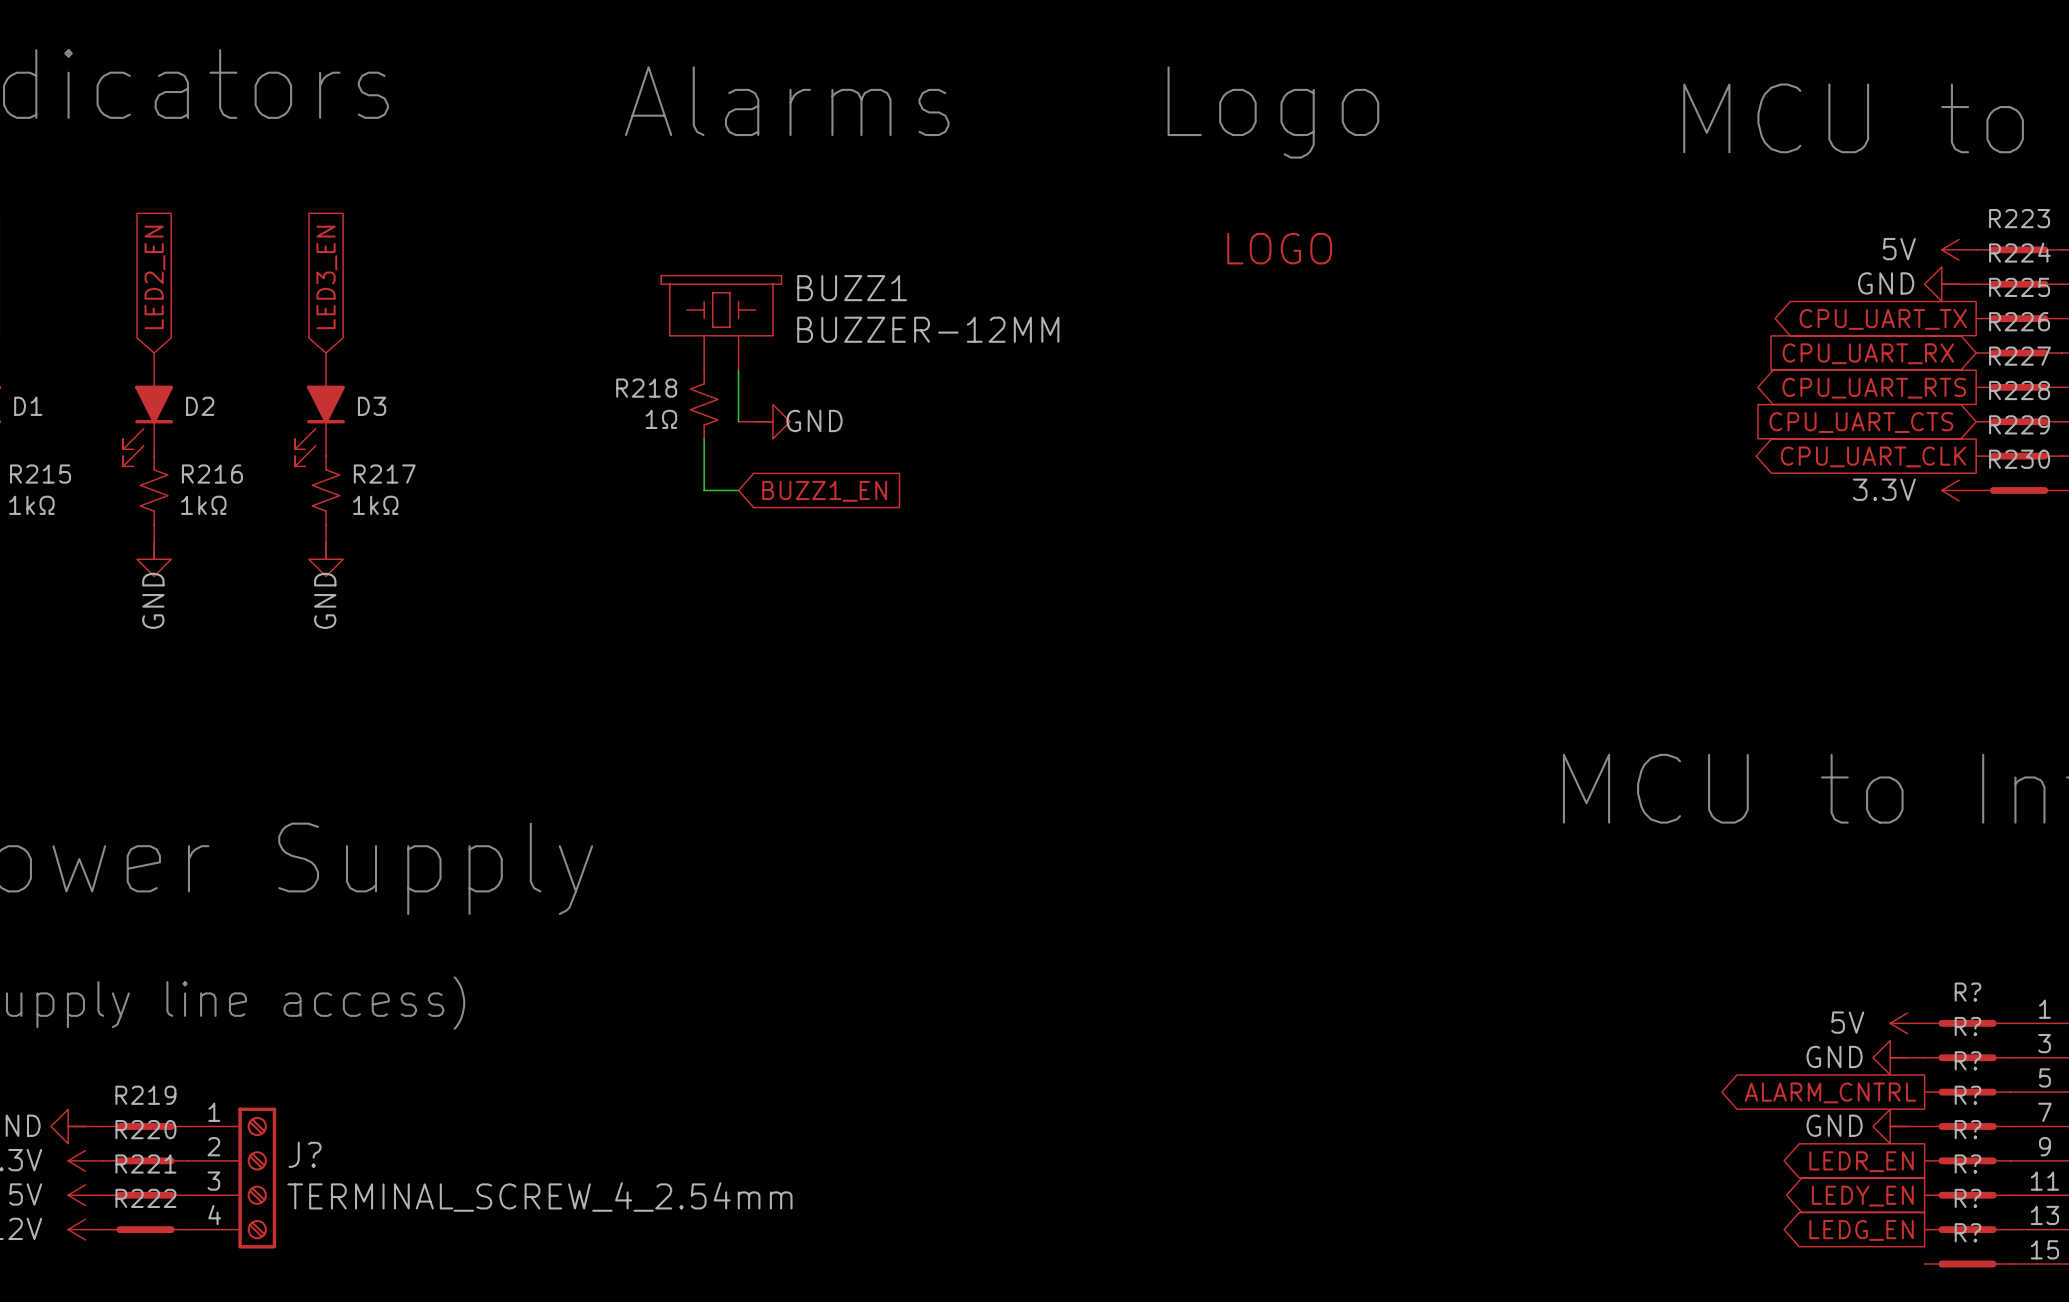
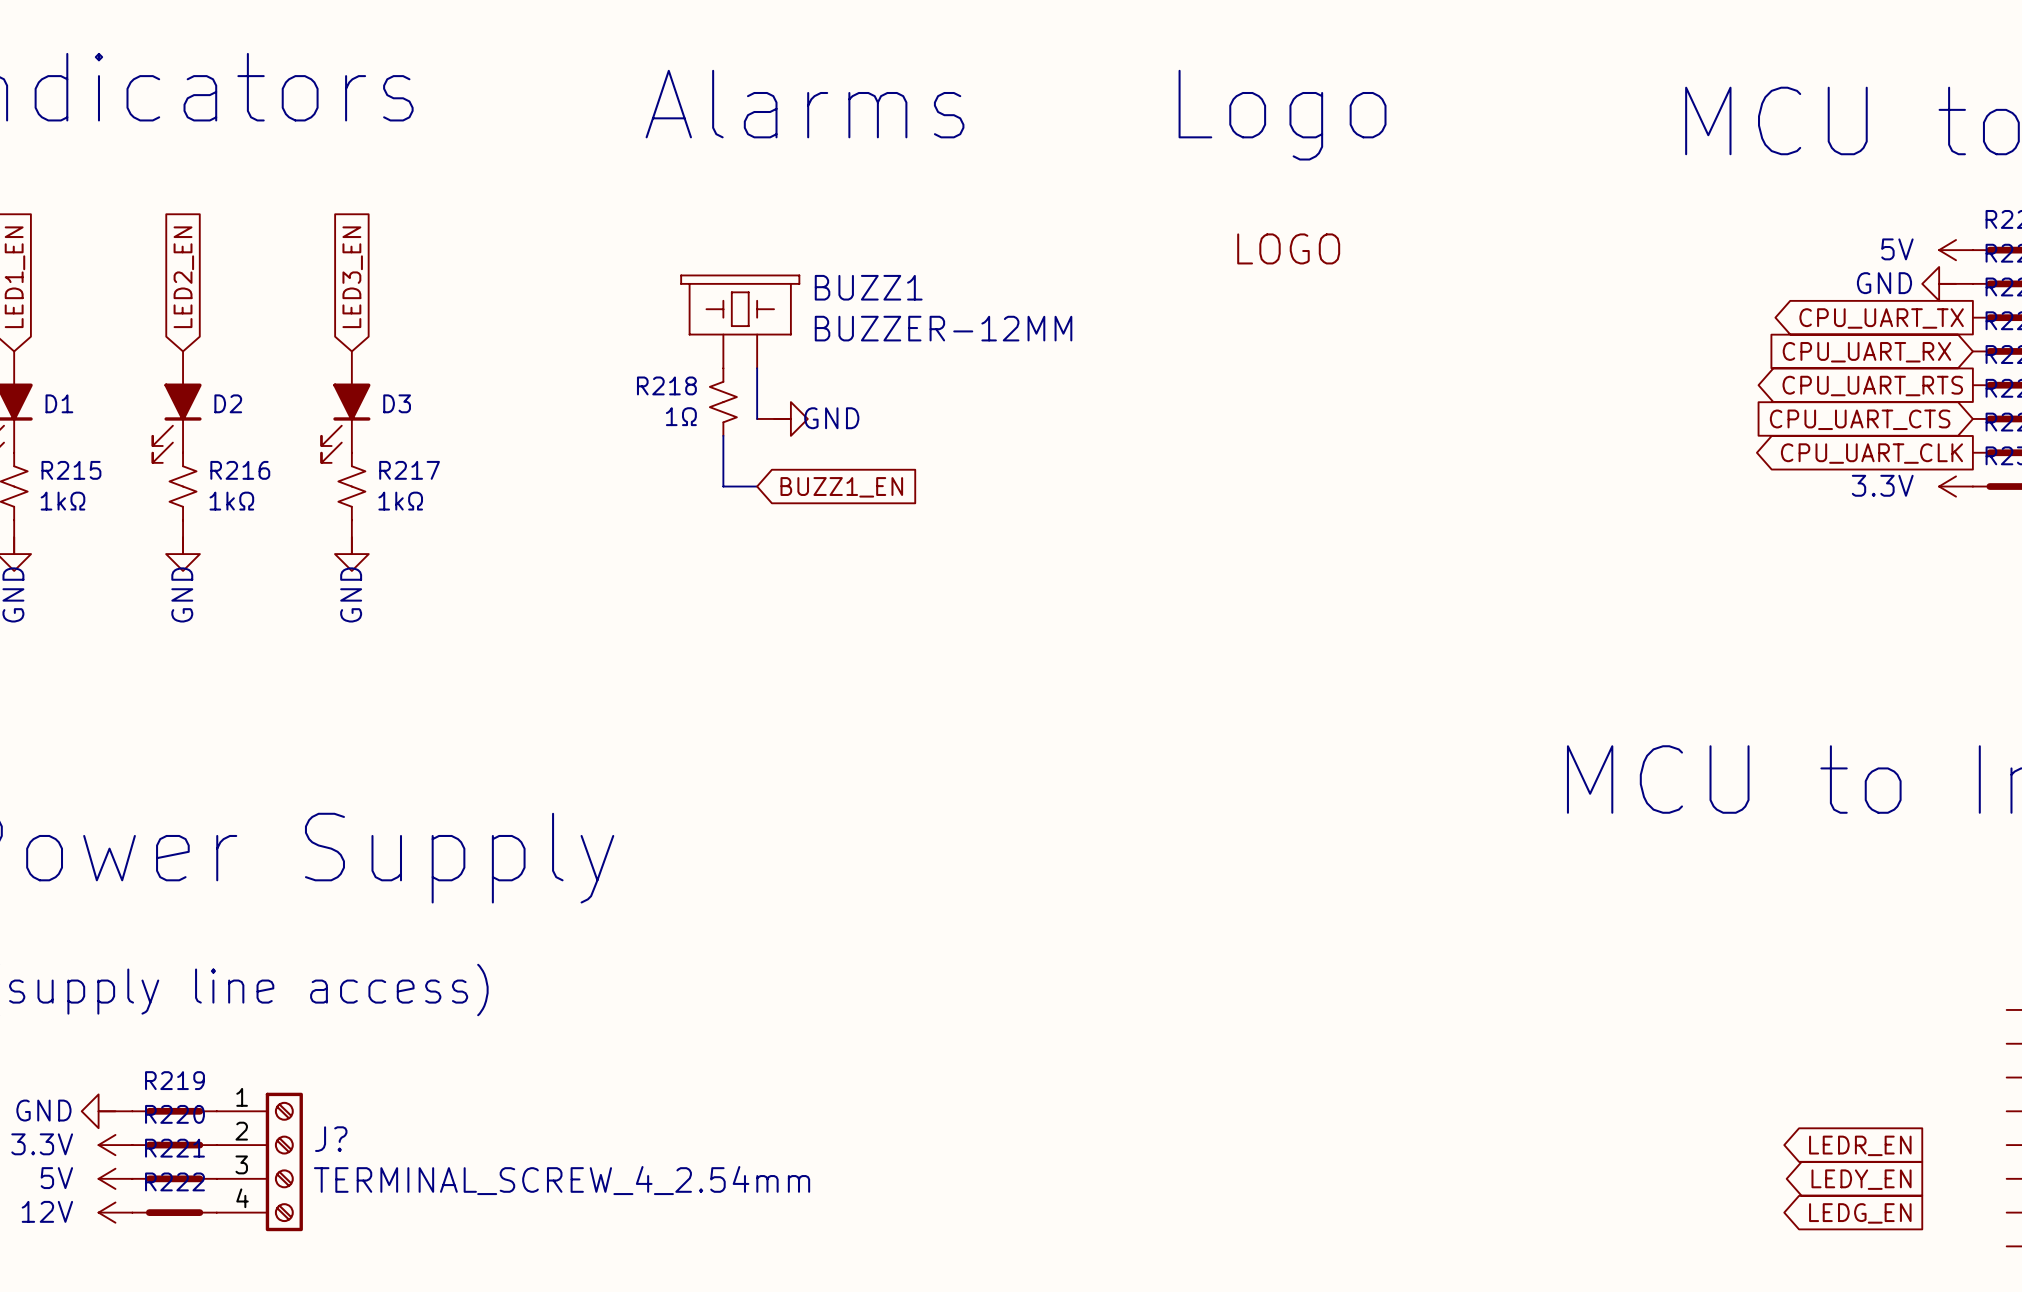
power symbol: 5V (1907, 1023) -> none
R?: (1967, 1023) -> none
power symbol: GND (1898, 1057) -> none
R?: (1967, 1057) -> none
global label: ALARM_CNTRL (1830, 1092) -> none
R?: (1967, 1092) -> none
power symbol: GND (1898, 1126) -> none
R?: (1967, 1126) -> none
R?: (1967, 1160) -> none
R?: (1967, 1195) -> none
R?: (1967, 1229) -> none
R?: (1967, 1264) -> none

